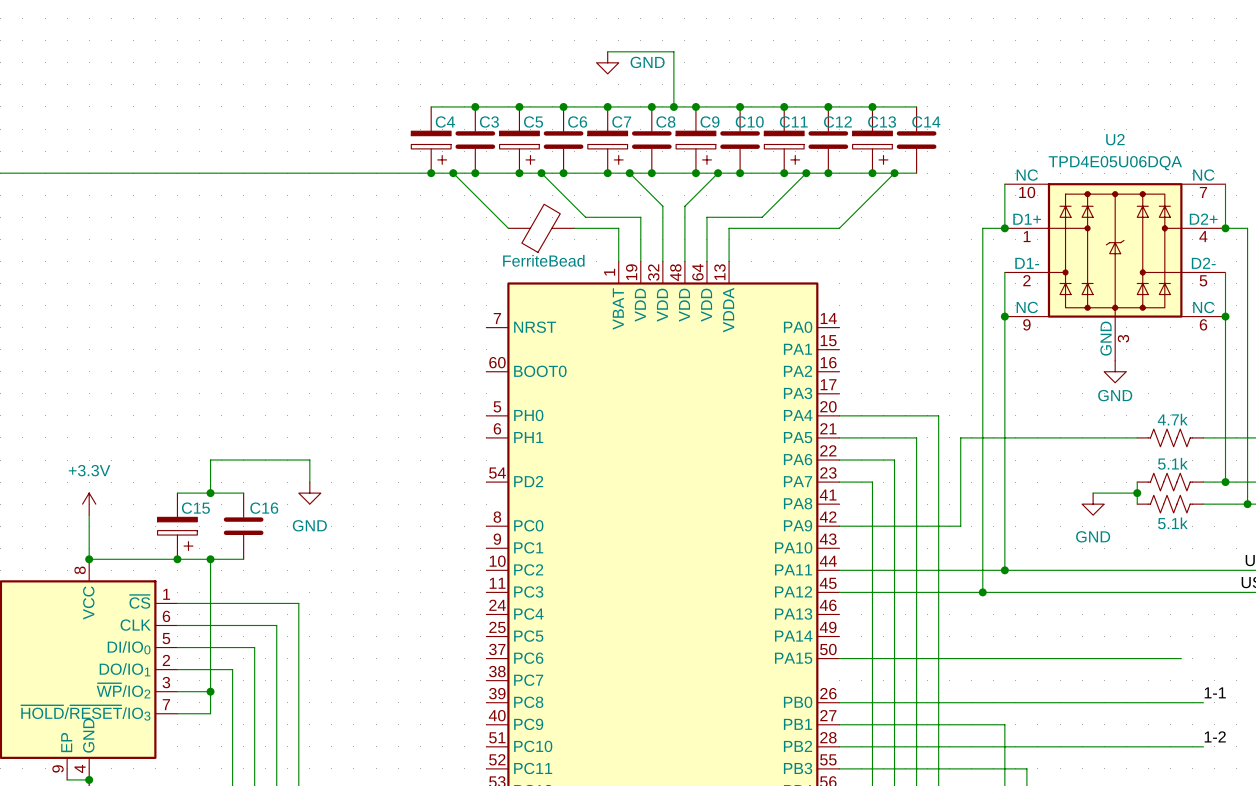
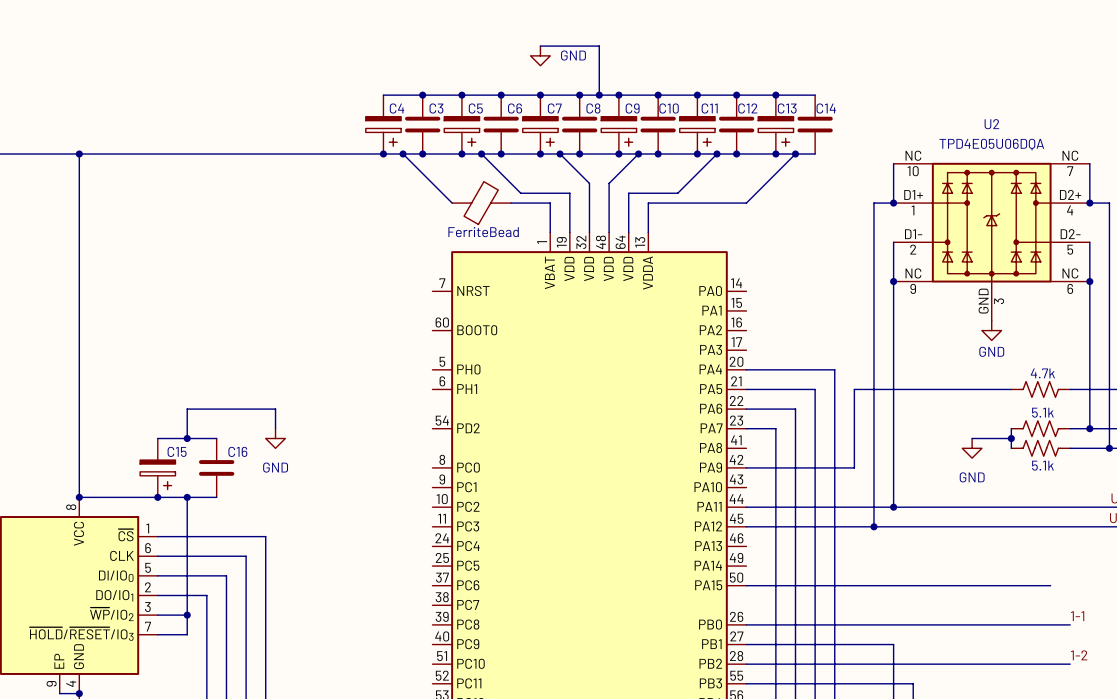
wire: none -> (79, 154) (79, 458)
junction: none -> (79, 154)
power symbol: +3.3V (89, 504) -> none

